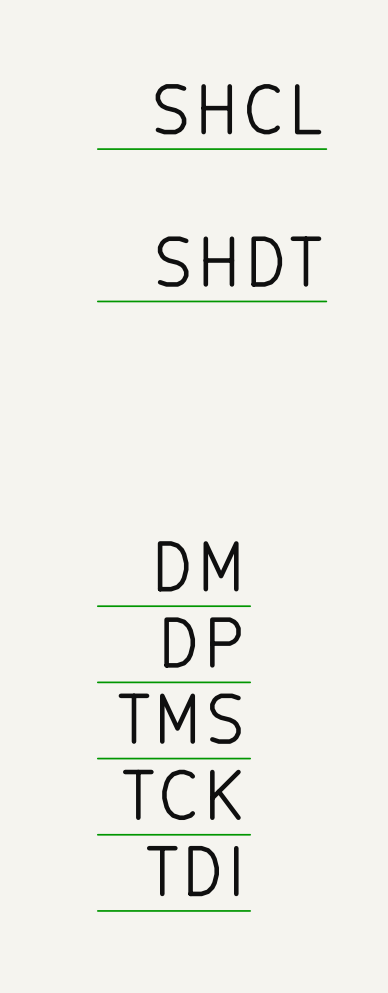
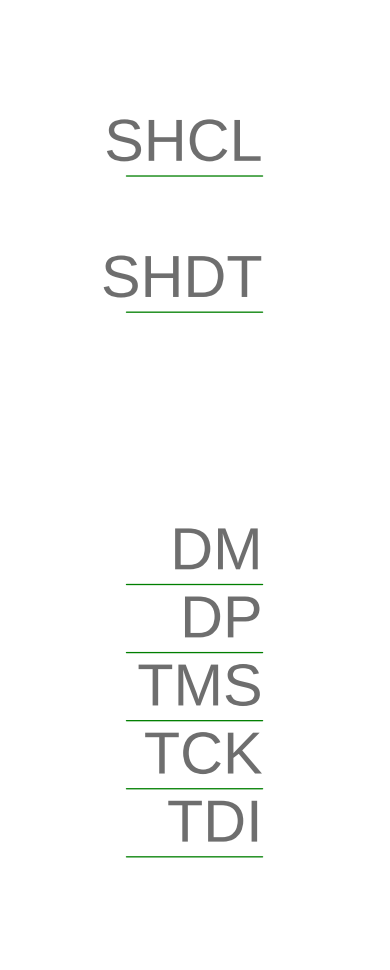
label position: SHCL (238, 109) -> SHCL (183, 140)
wire: (250, 149) (326, 149) -> none
label position: SHDT (239, 261) -> SHDT (182, 276)
wire: (250, 301) (326, 301) -> none

